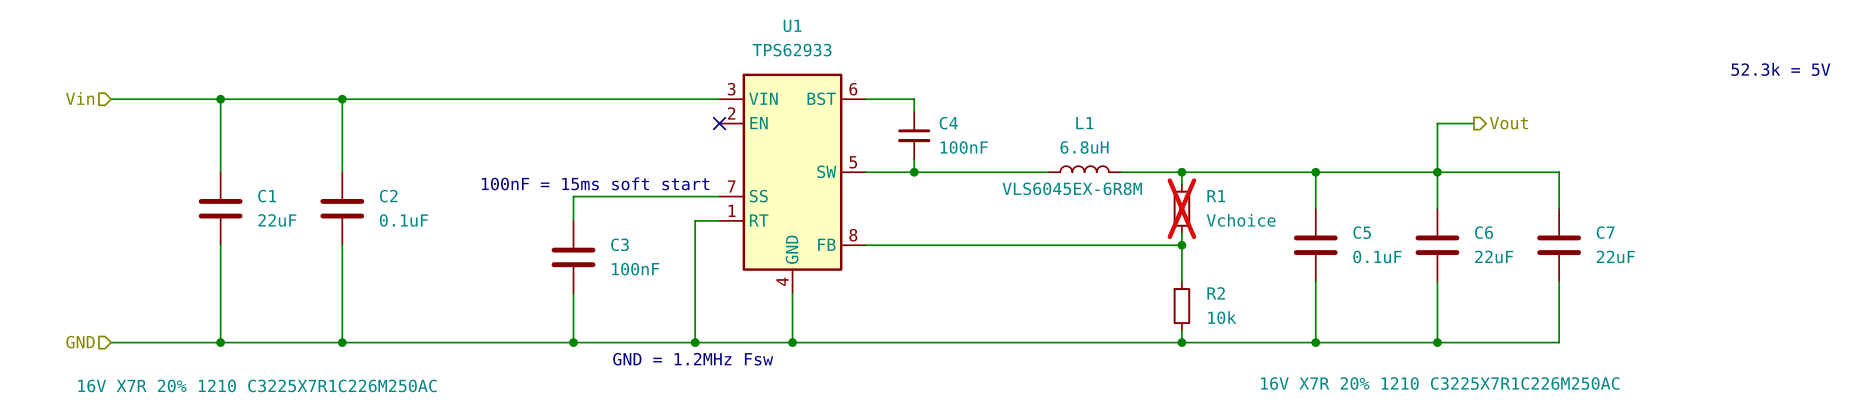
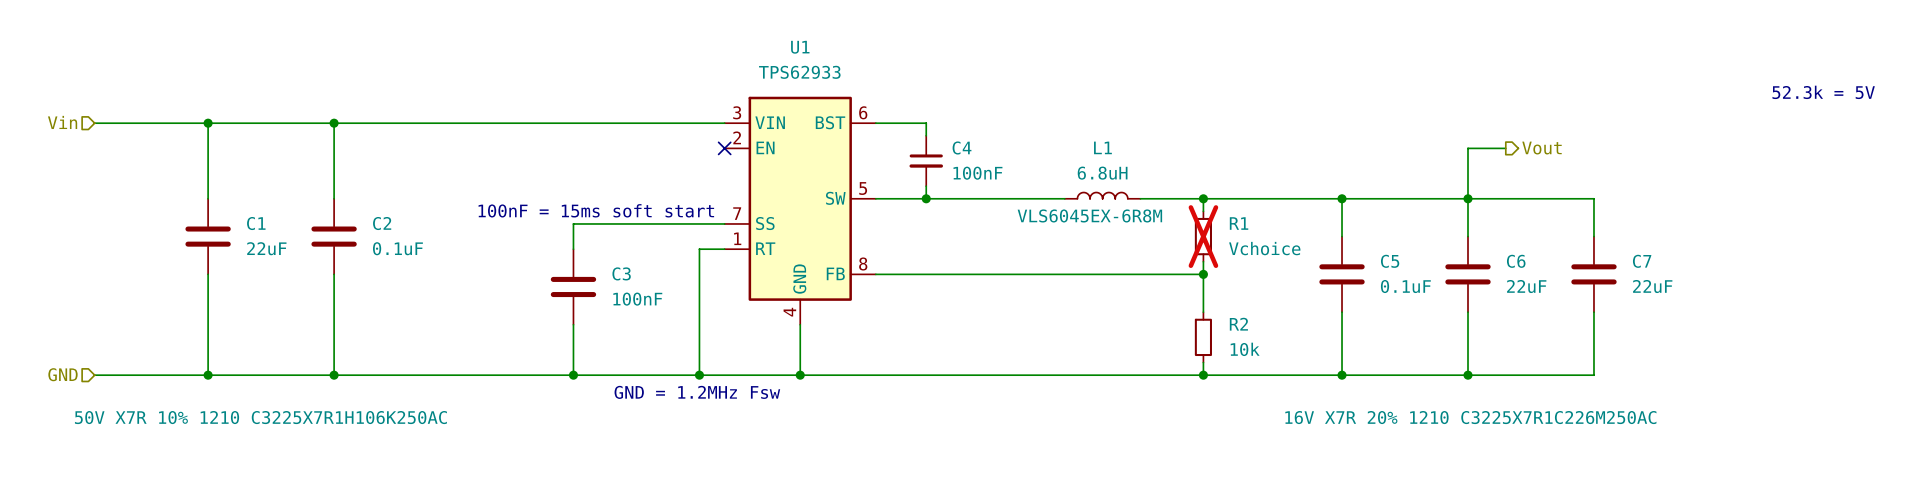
C1 text: 16V X7R 20% 1210 C3225X7R1C226M250AC (257, 385) -> 50V X7R 10% 1210 C3225X7R1H106K250AC (260, 417)

